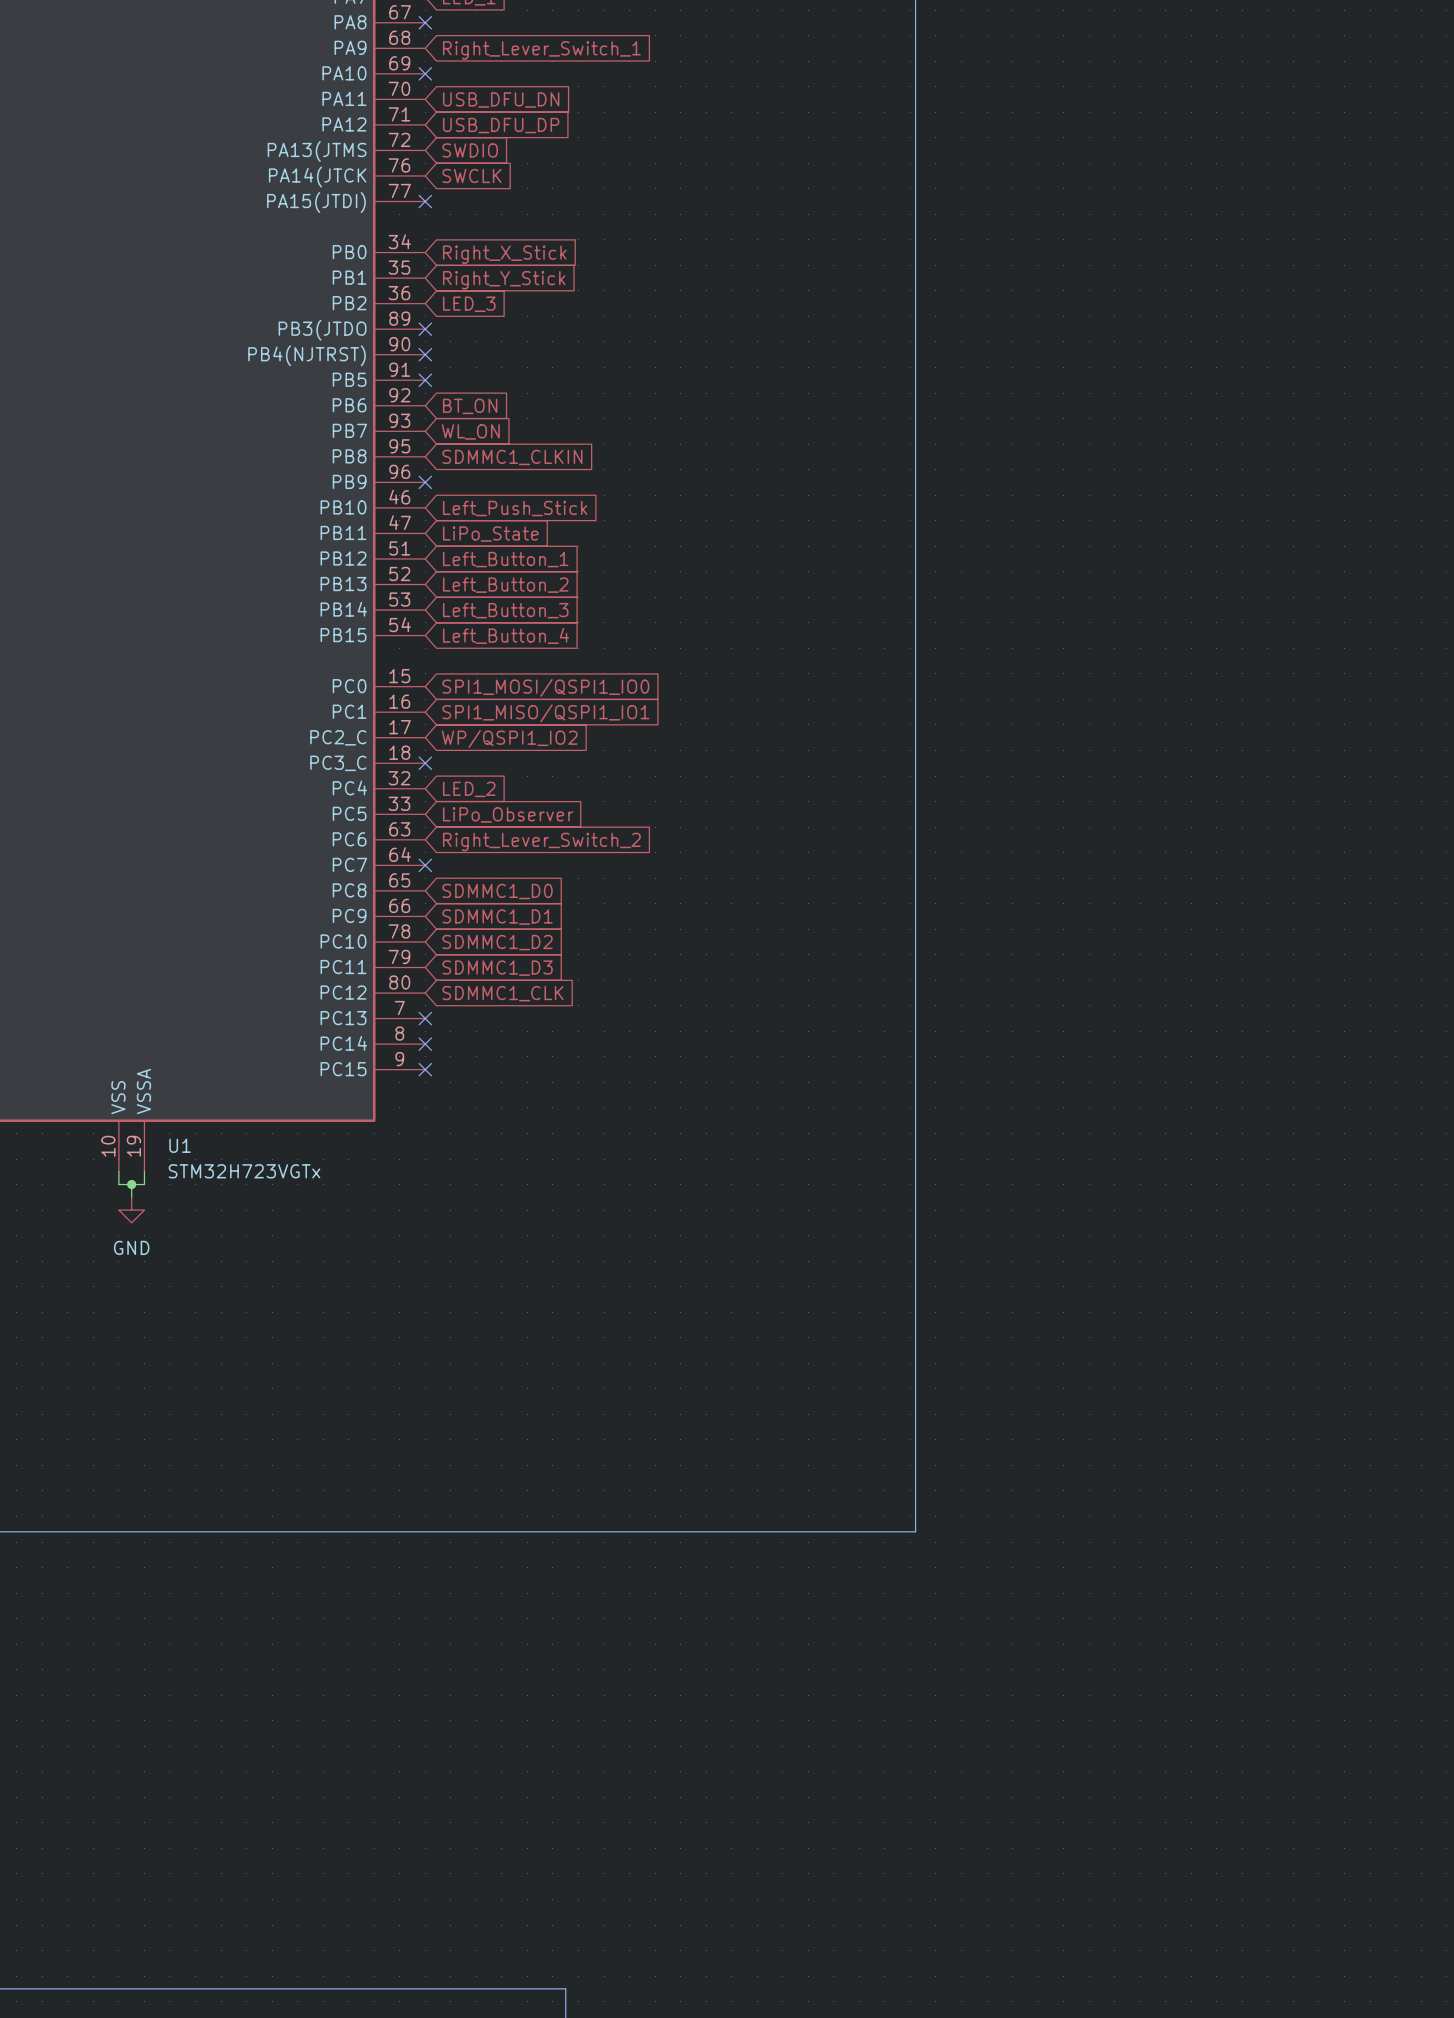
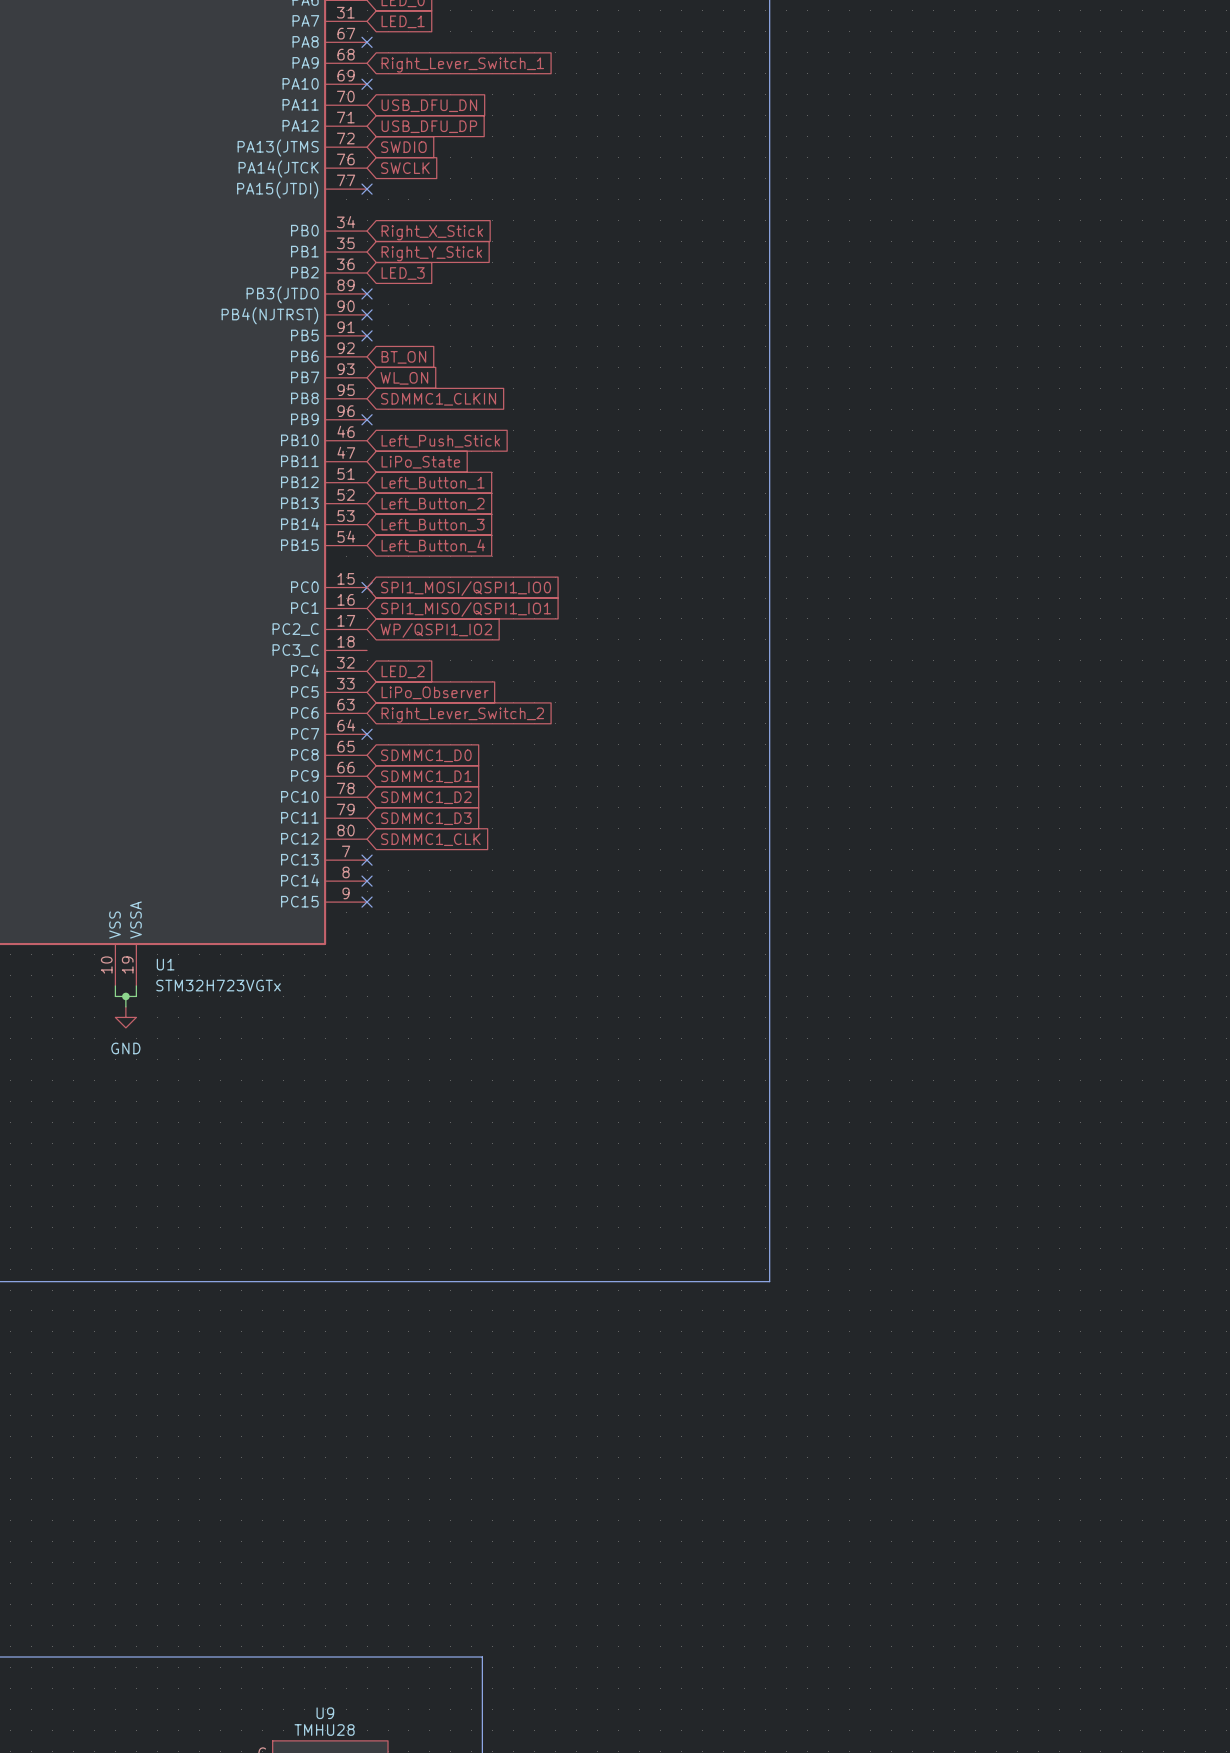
no-connect mark: none -> (367, 587)
no-connect mark: (425, 763) -> none

